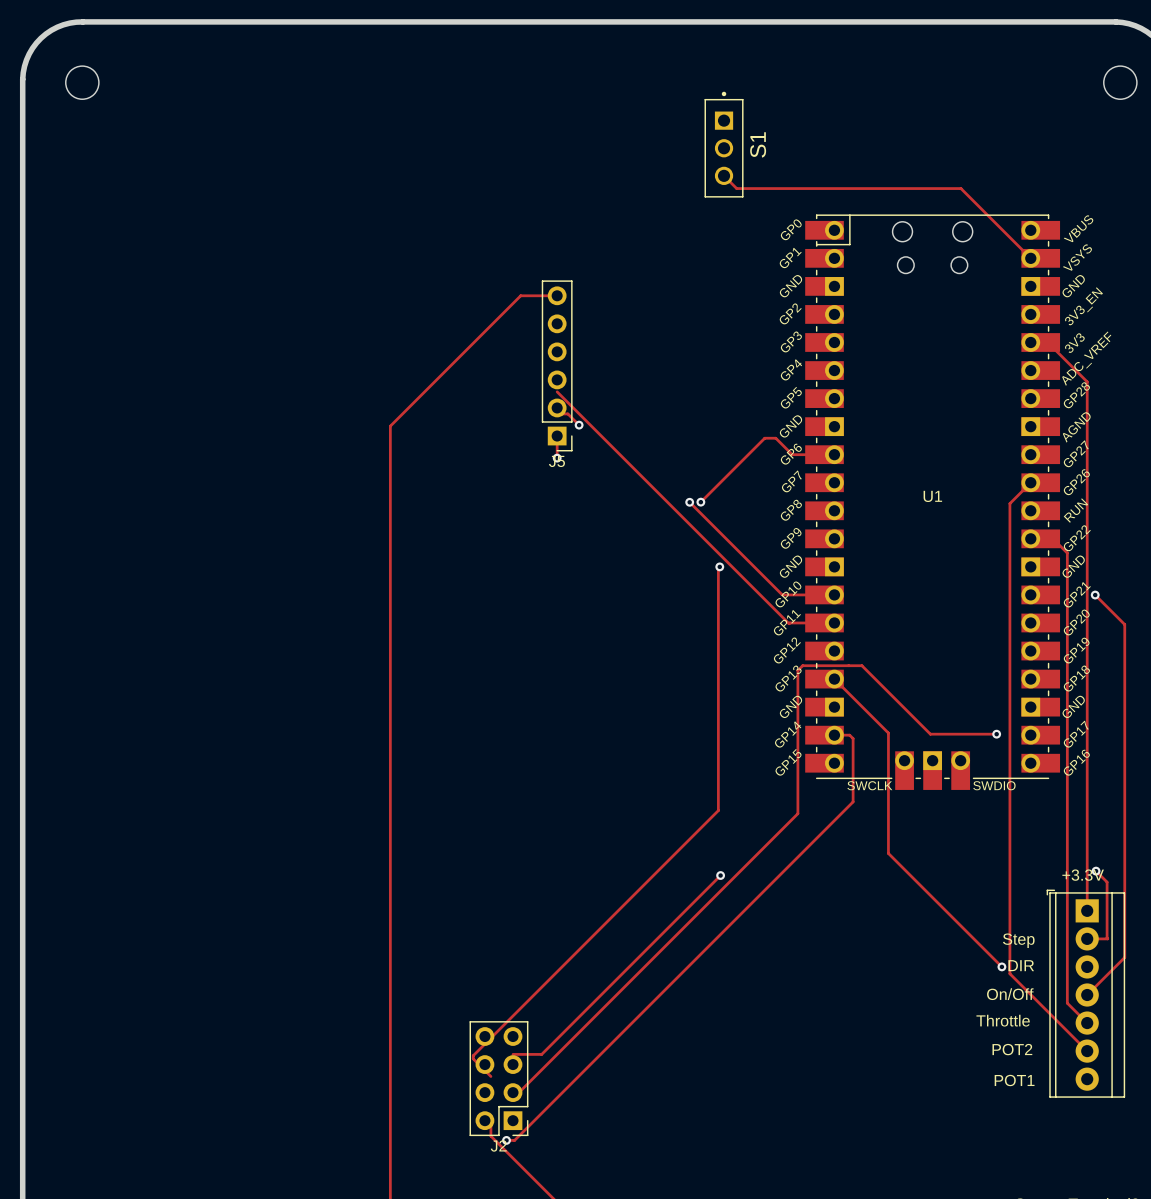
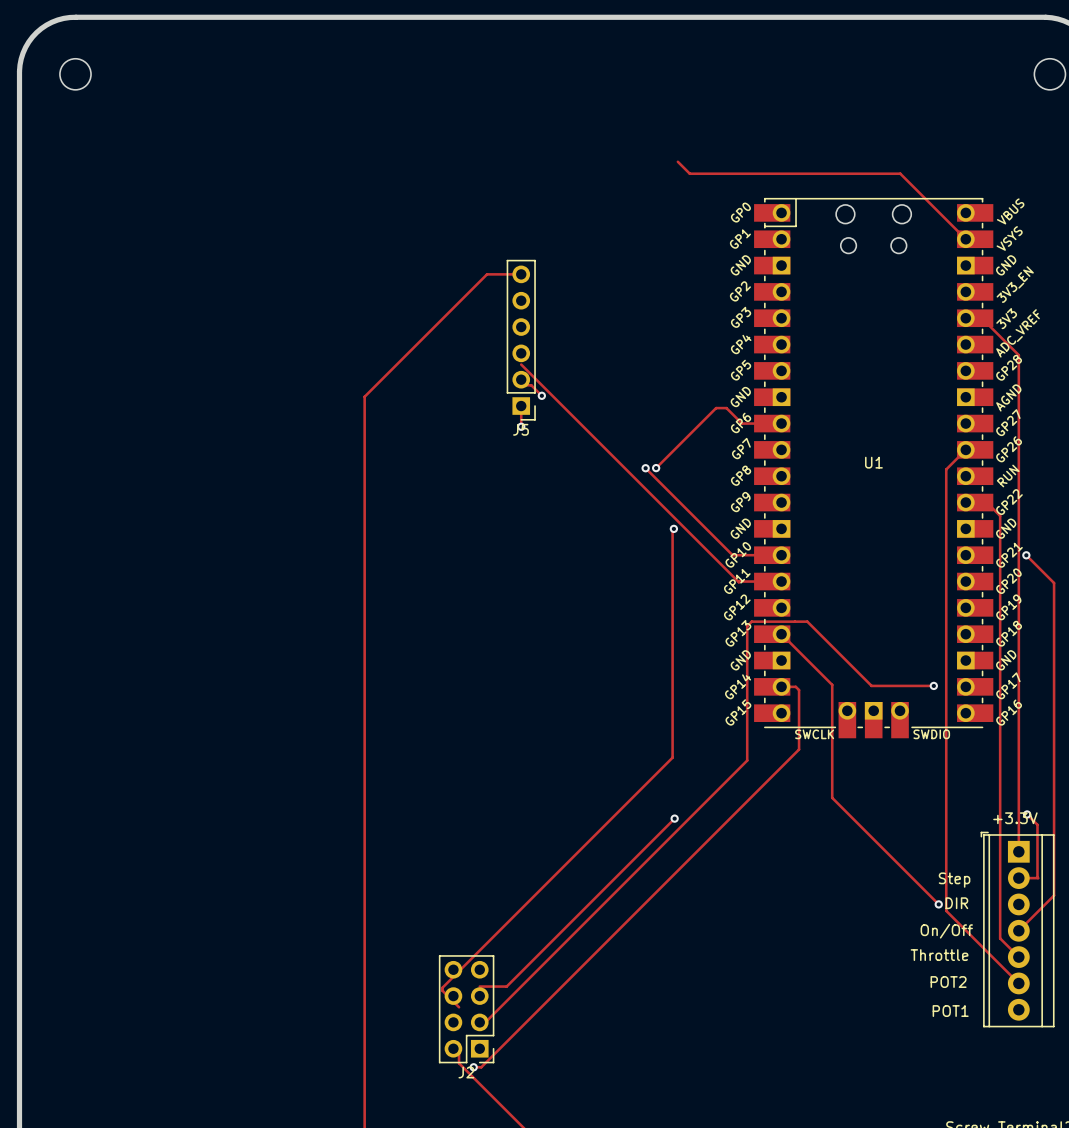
S1: (724, 144) -> none

